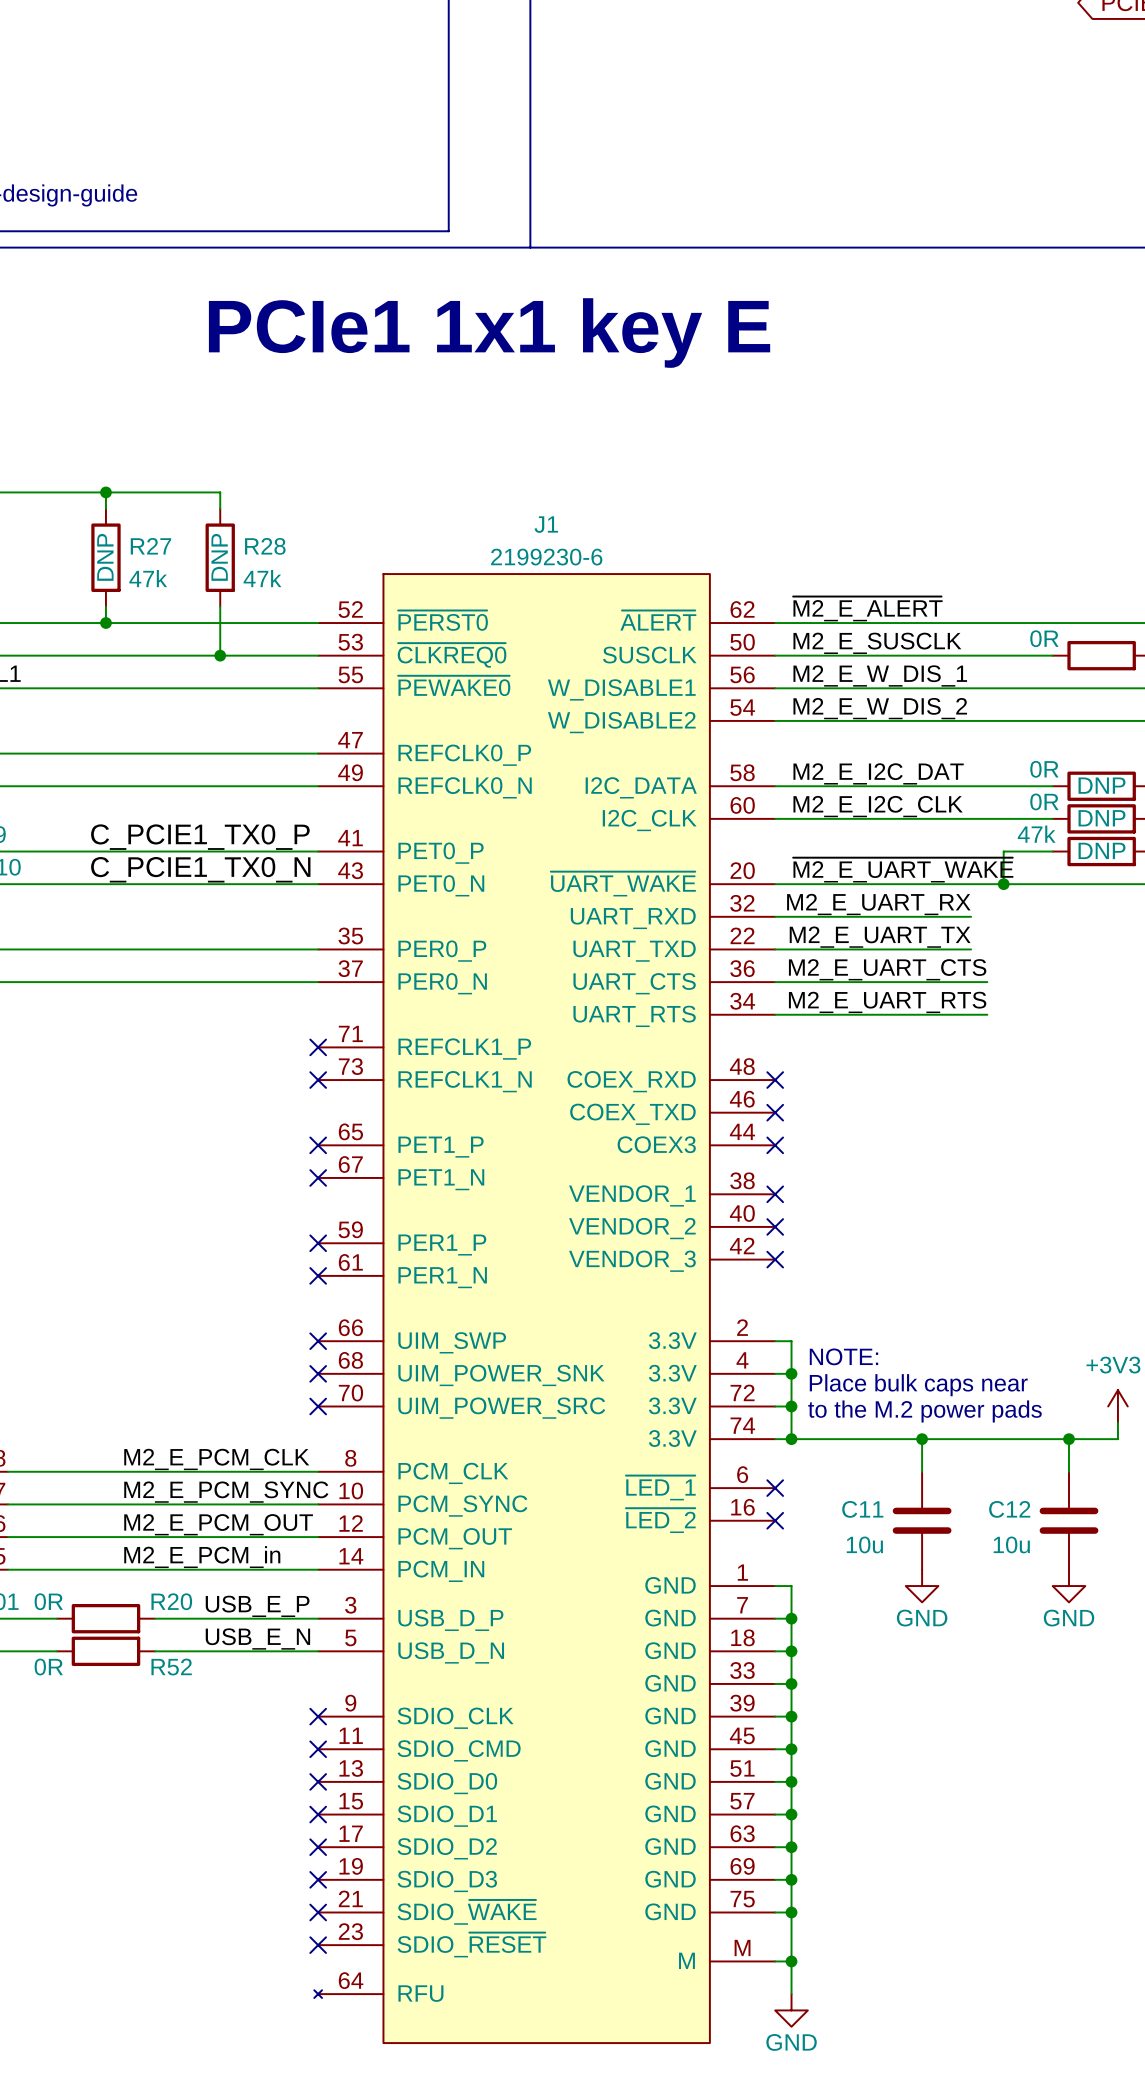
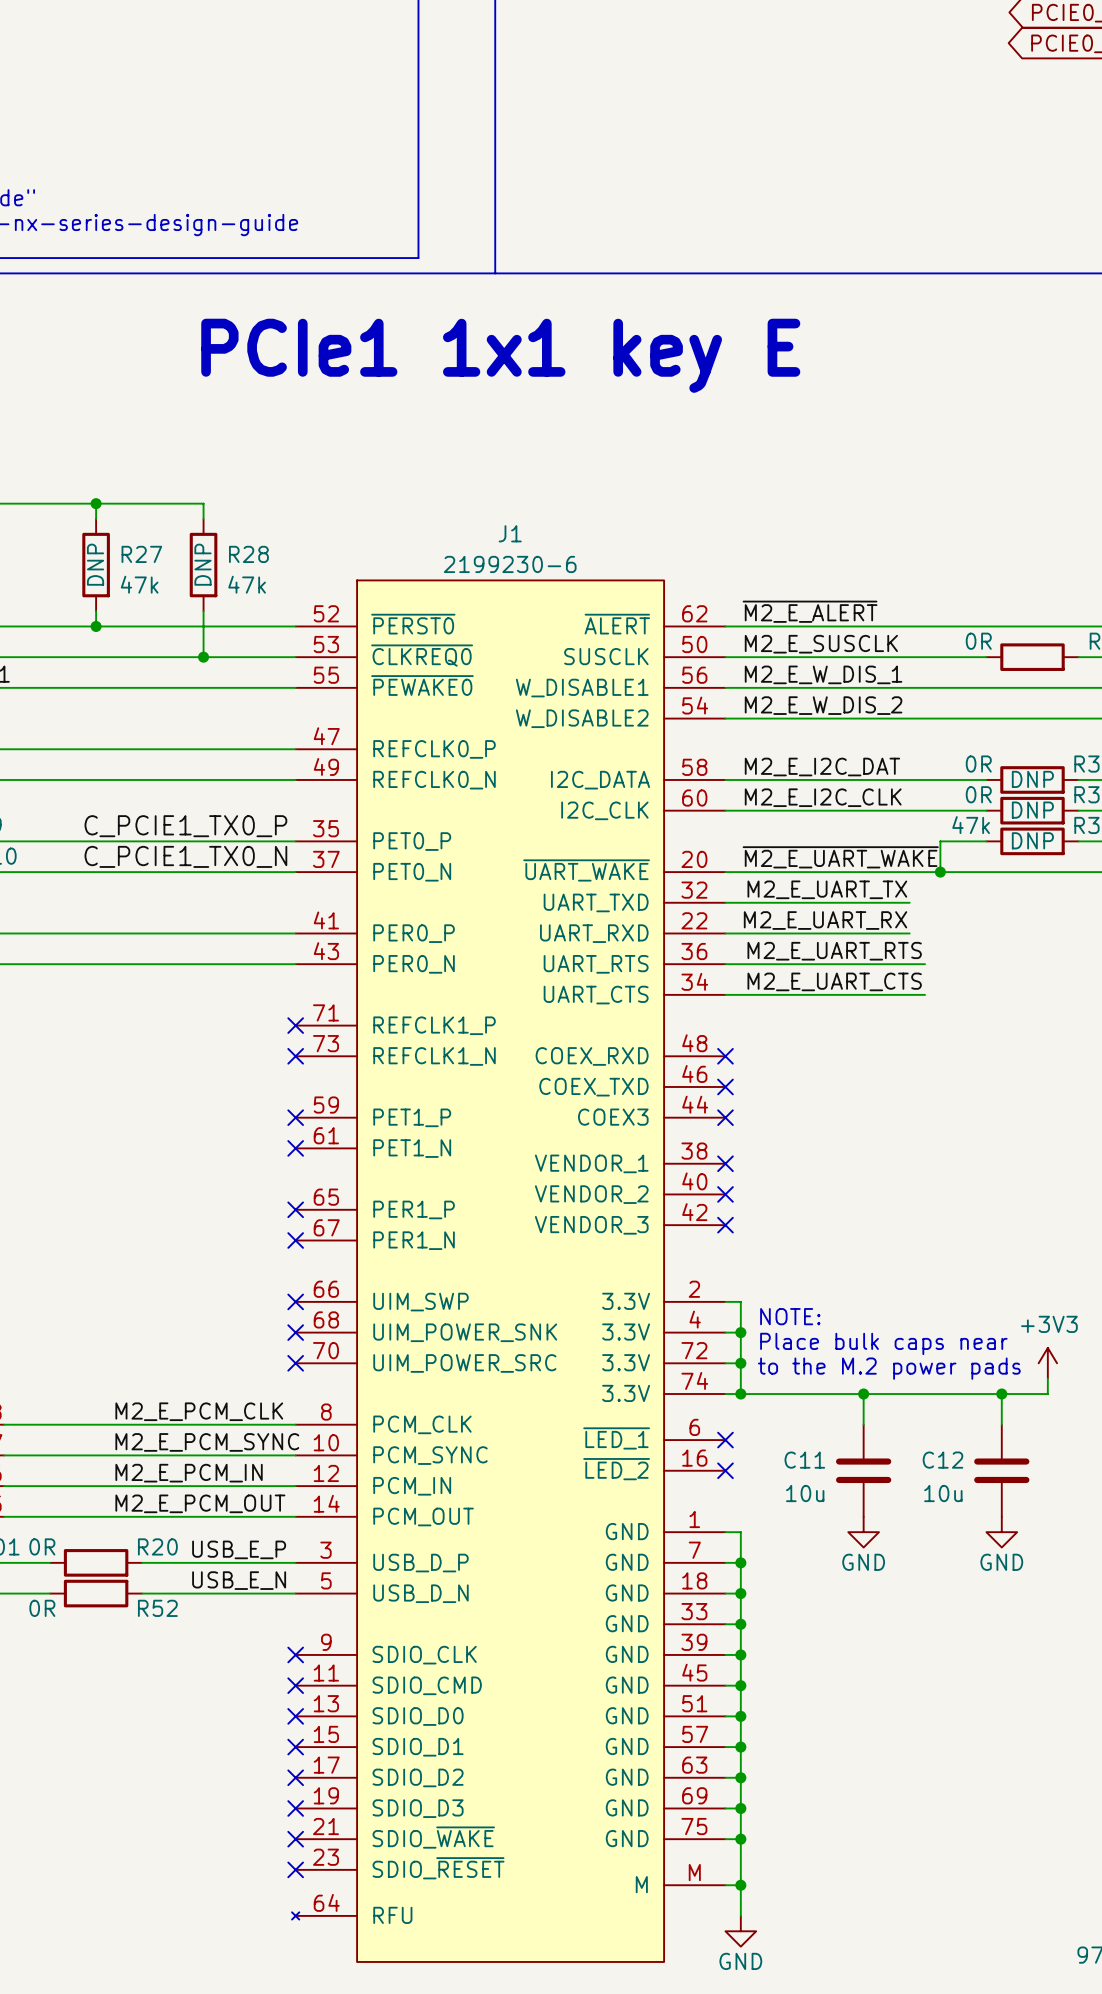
J1 symbol: [314, 574, 776, 2044] -> [292, 580, 726, 1962]
label: M2_E_UART_RX (878, 904) -> M2_E_UART_TX (827, 889)
label: M2_E_UART_TX (880, 937) -> M2_E_UART_RX (825, 920)
label: M2_E_UART_CTS (887, 969) -> M2_E_UART_RTS (834, 951)
label: M2_E_UART_RTS (887, 1002) -> M2_E_UART_CTS (834, 981)
label: M2_E_PCM_OUT (218, 1524) -> M2_E_PCM_IN (189, 1473)
label: M2_E_PCM_in (202, 1557) -> M2_E_PCM_OUT (200, 1503)

